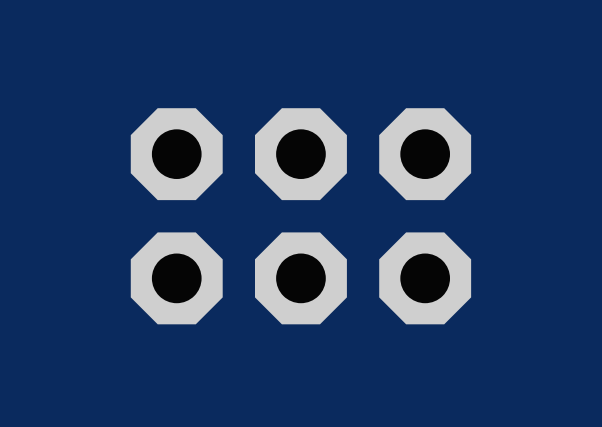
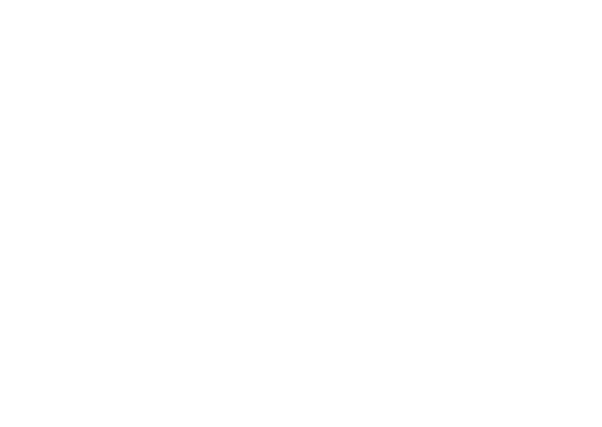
part: (300, 216) -> none

